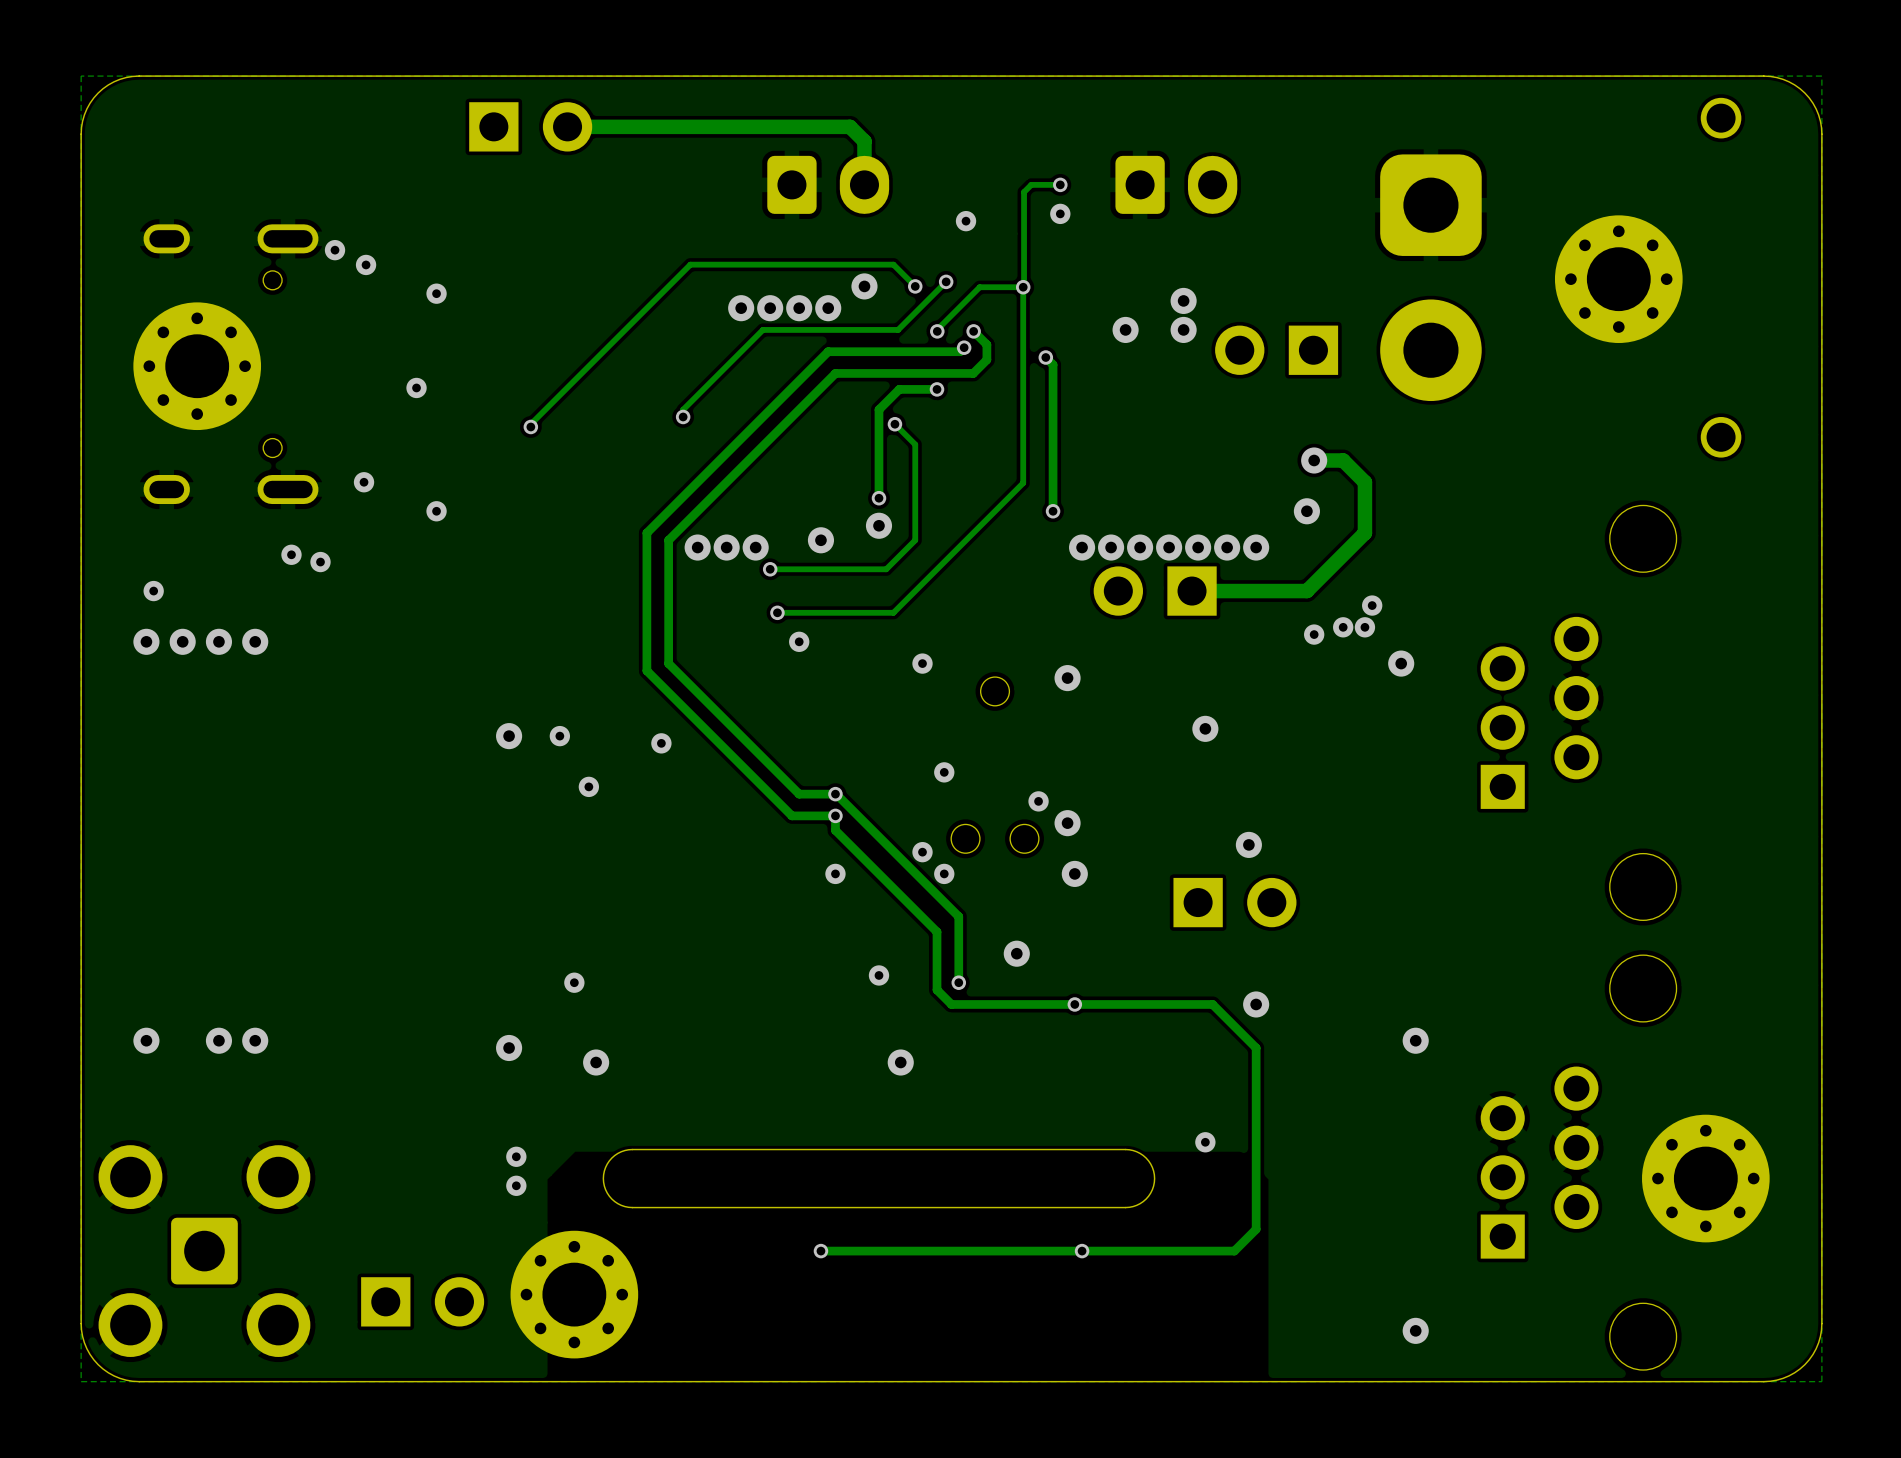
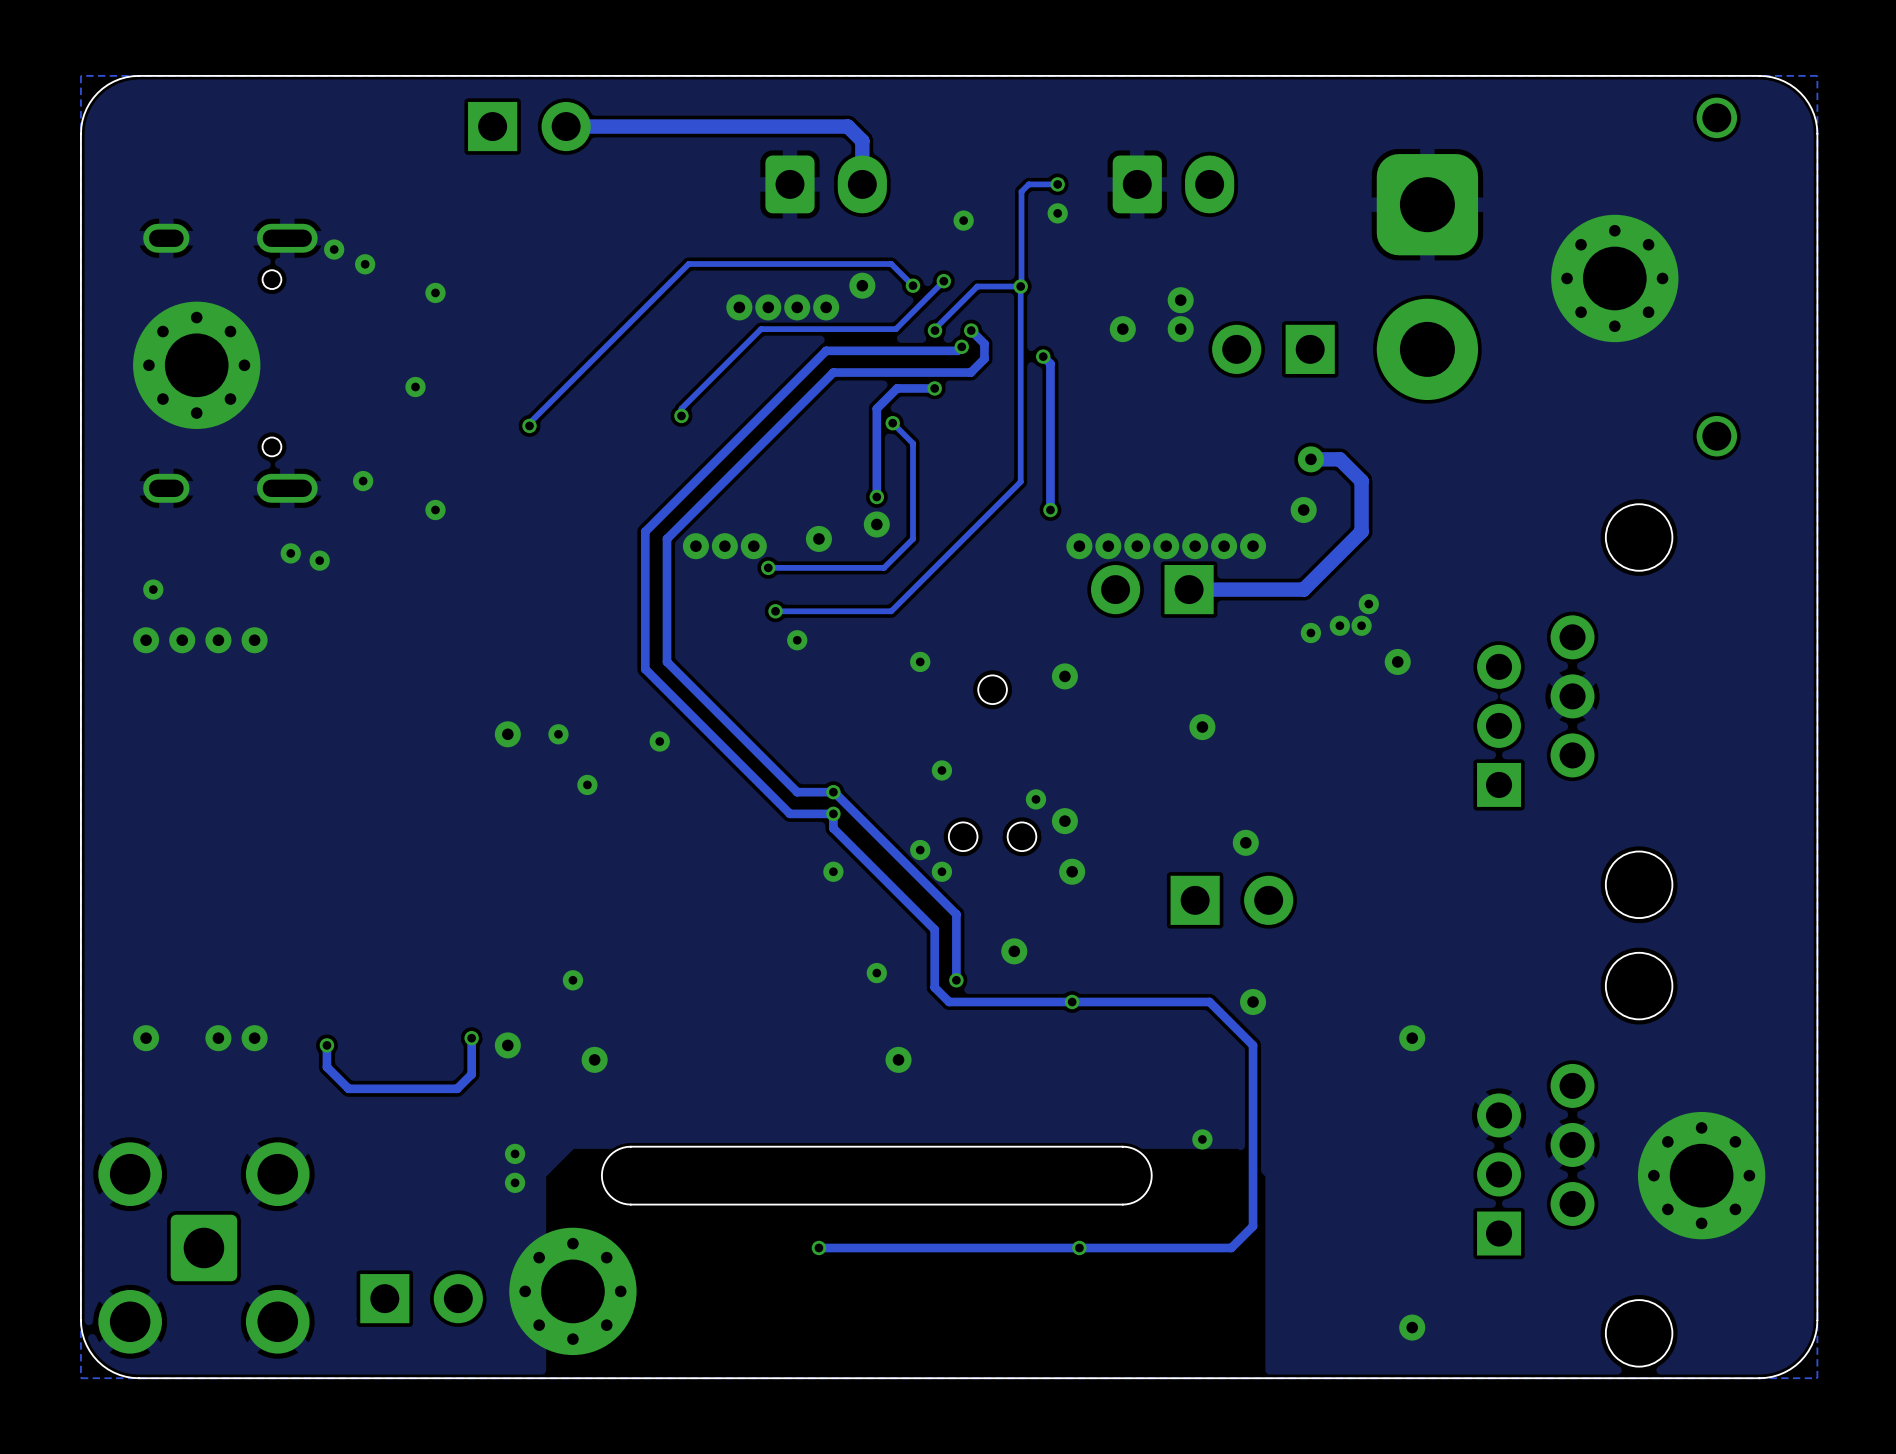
track: none -> (471, 1038) (471, 1074) (457, 1088) (348, 1088) (326, 1067) (326, 1045)
via: none -> (471, 1038)
via: none -> (326, 1045)

